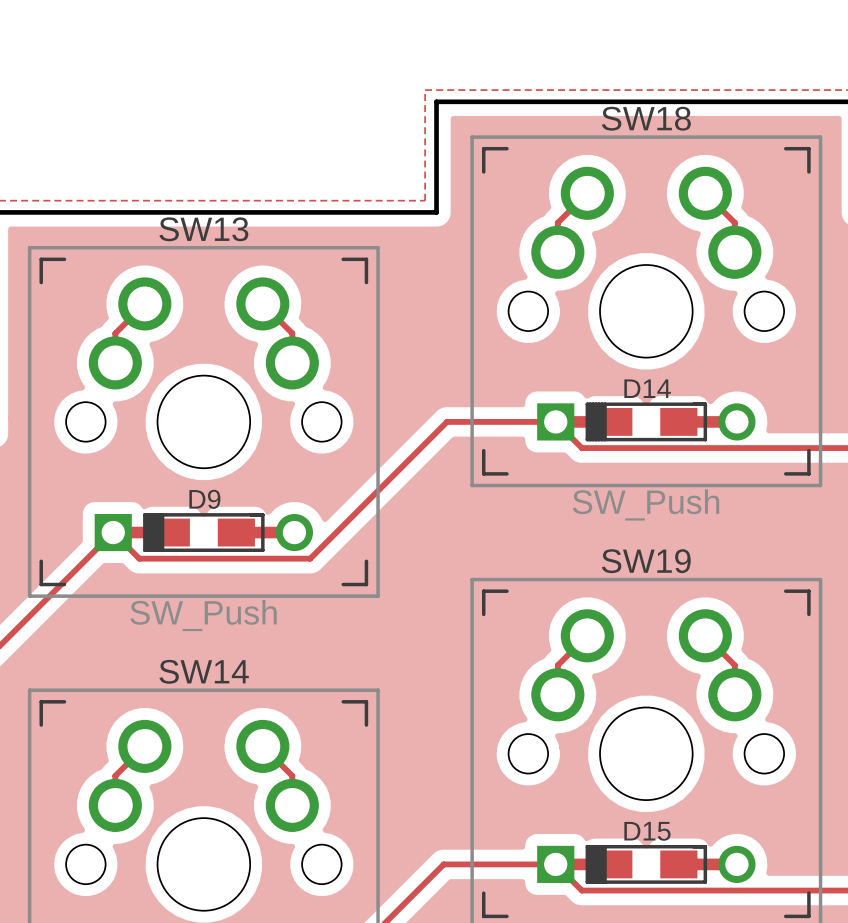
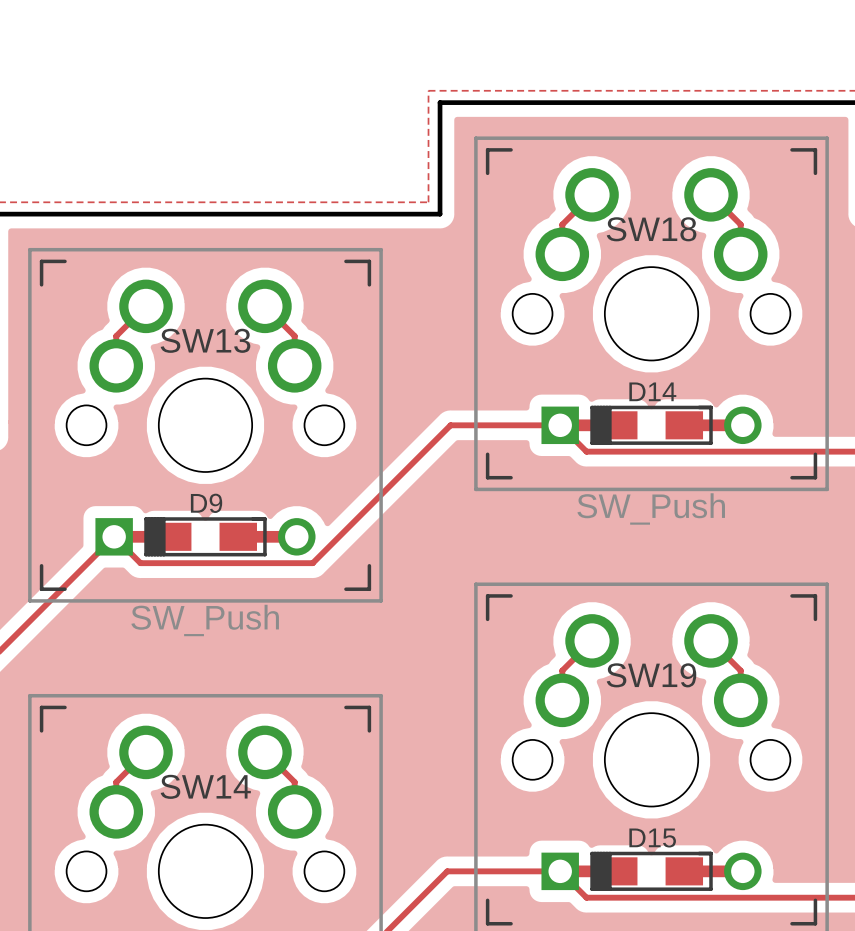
SW18 name position: SW18 (646, 118) -> SW18 (651, 229)
SW13 name position: SW13 (203, 229) -> SW13 (205, 340)
SW19 name position: SW19 (646, 561) -> SW19 (651, 675)
SW14 name position: SW14 (204, 671) -> SW14 (205, 786)

